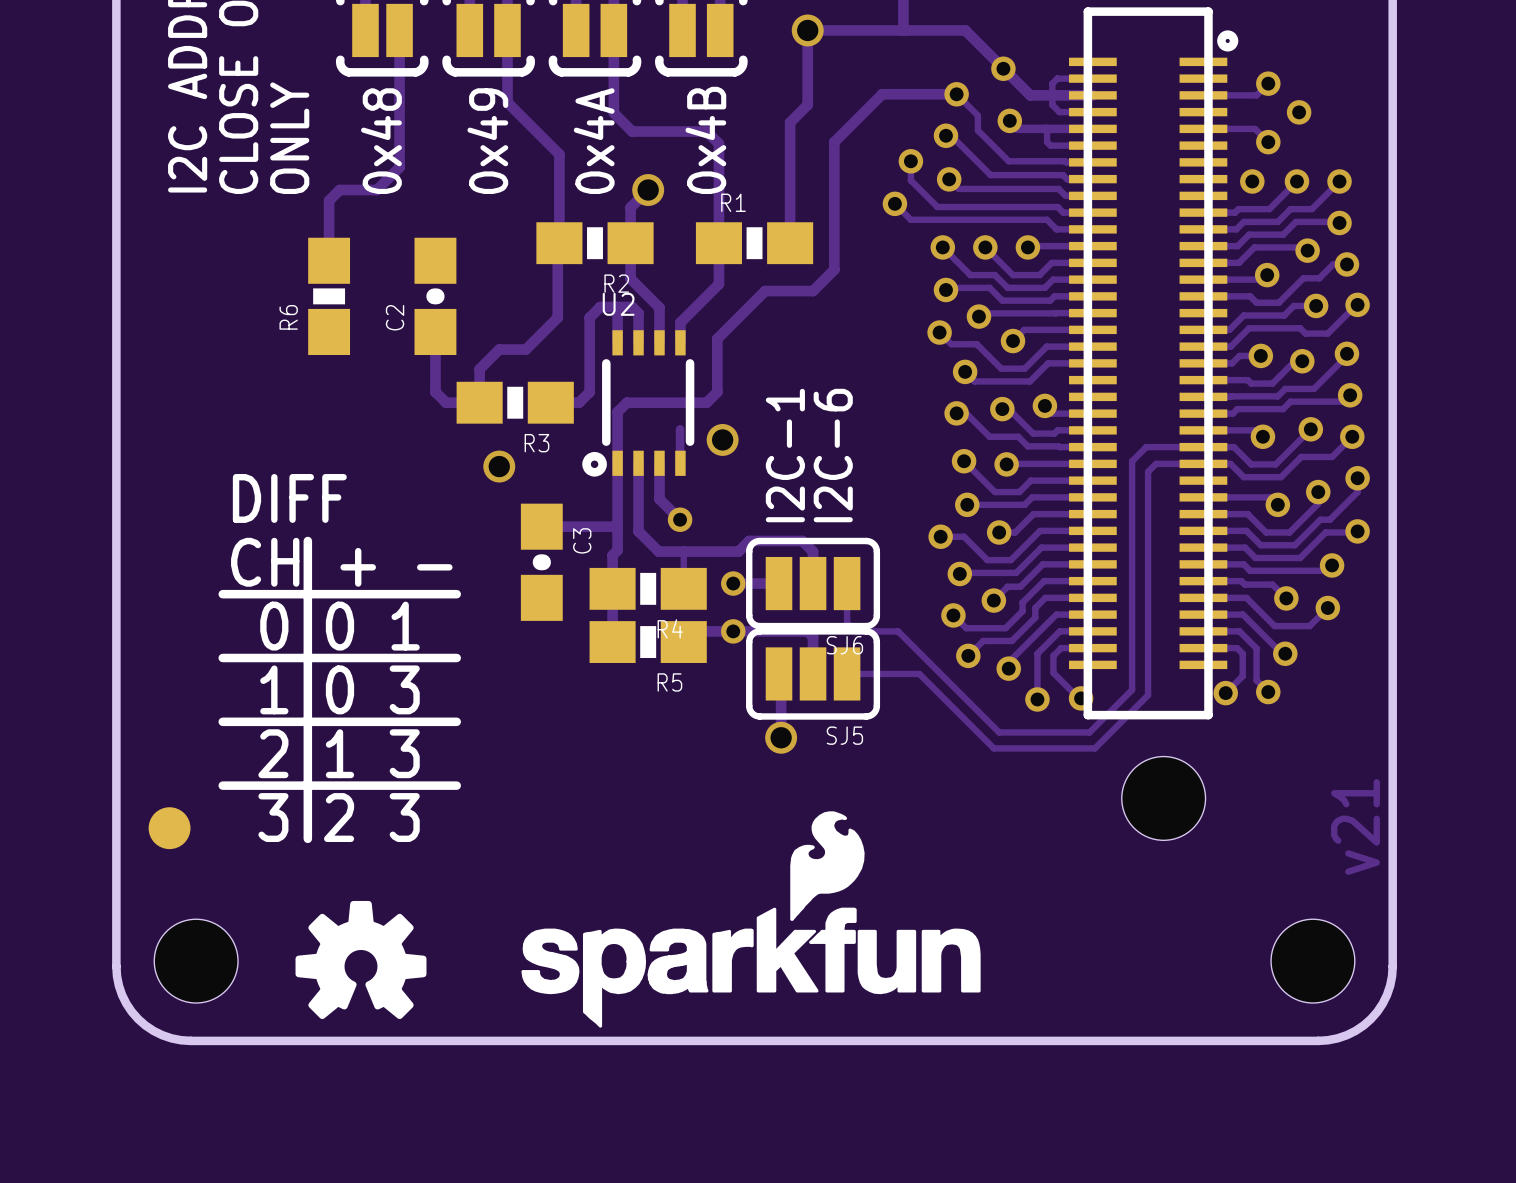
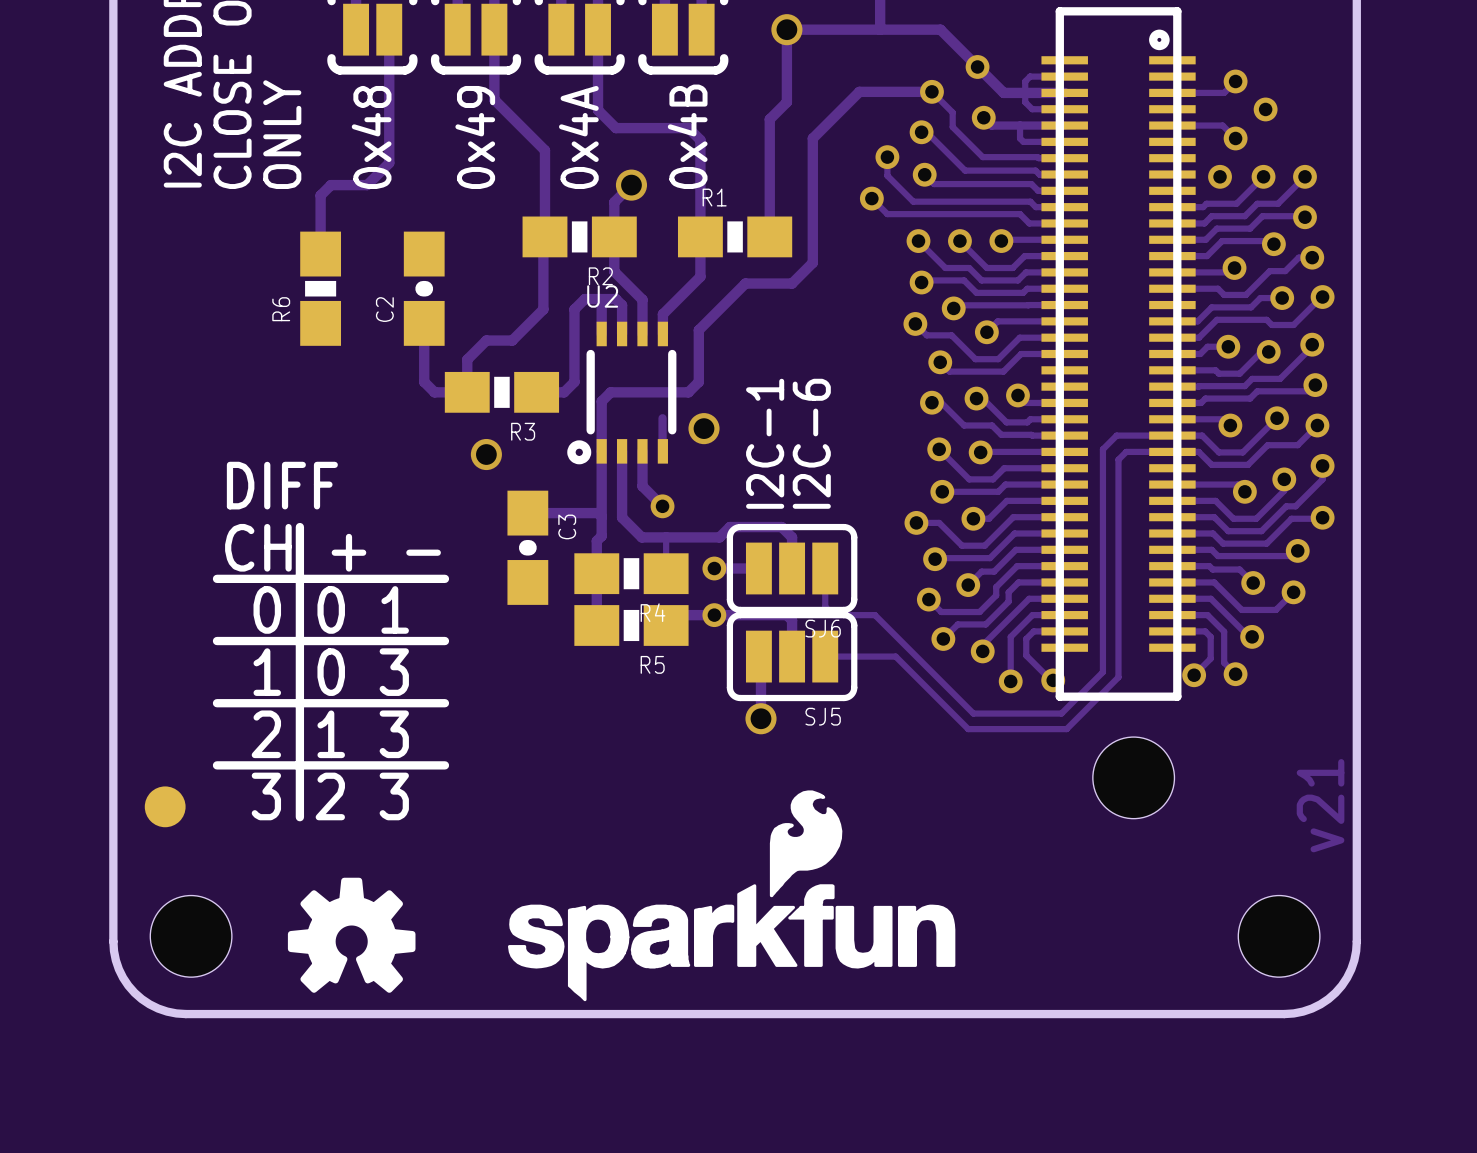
part footprint: [1069, 7, 1239, 720] -> [1041, 7, 1196, 701]

